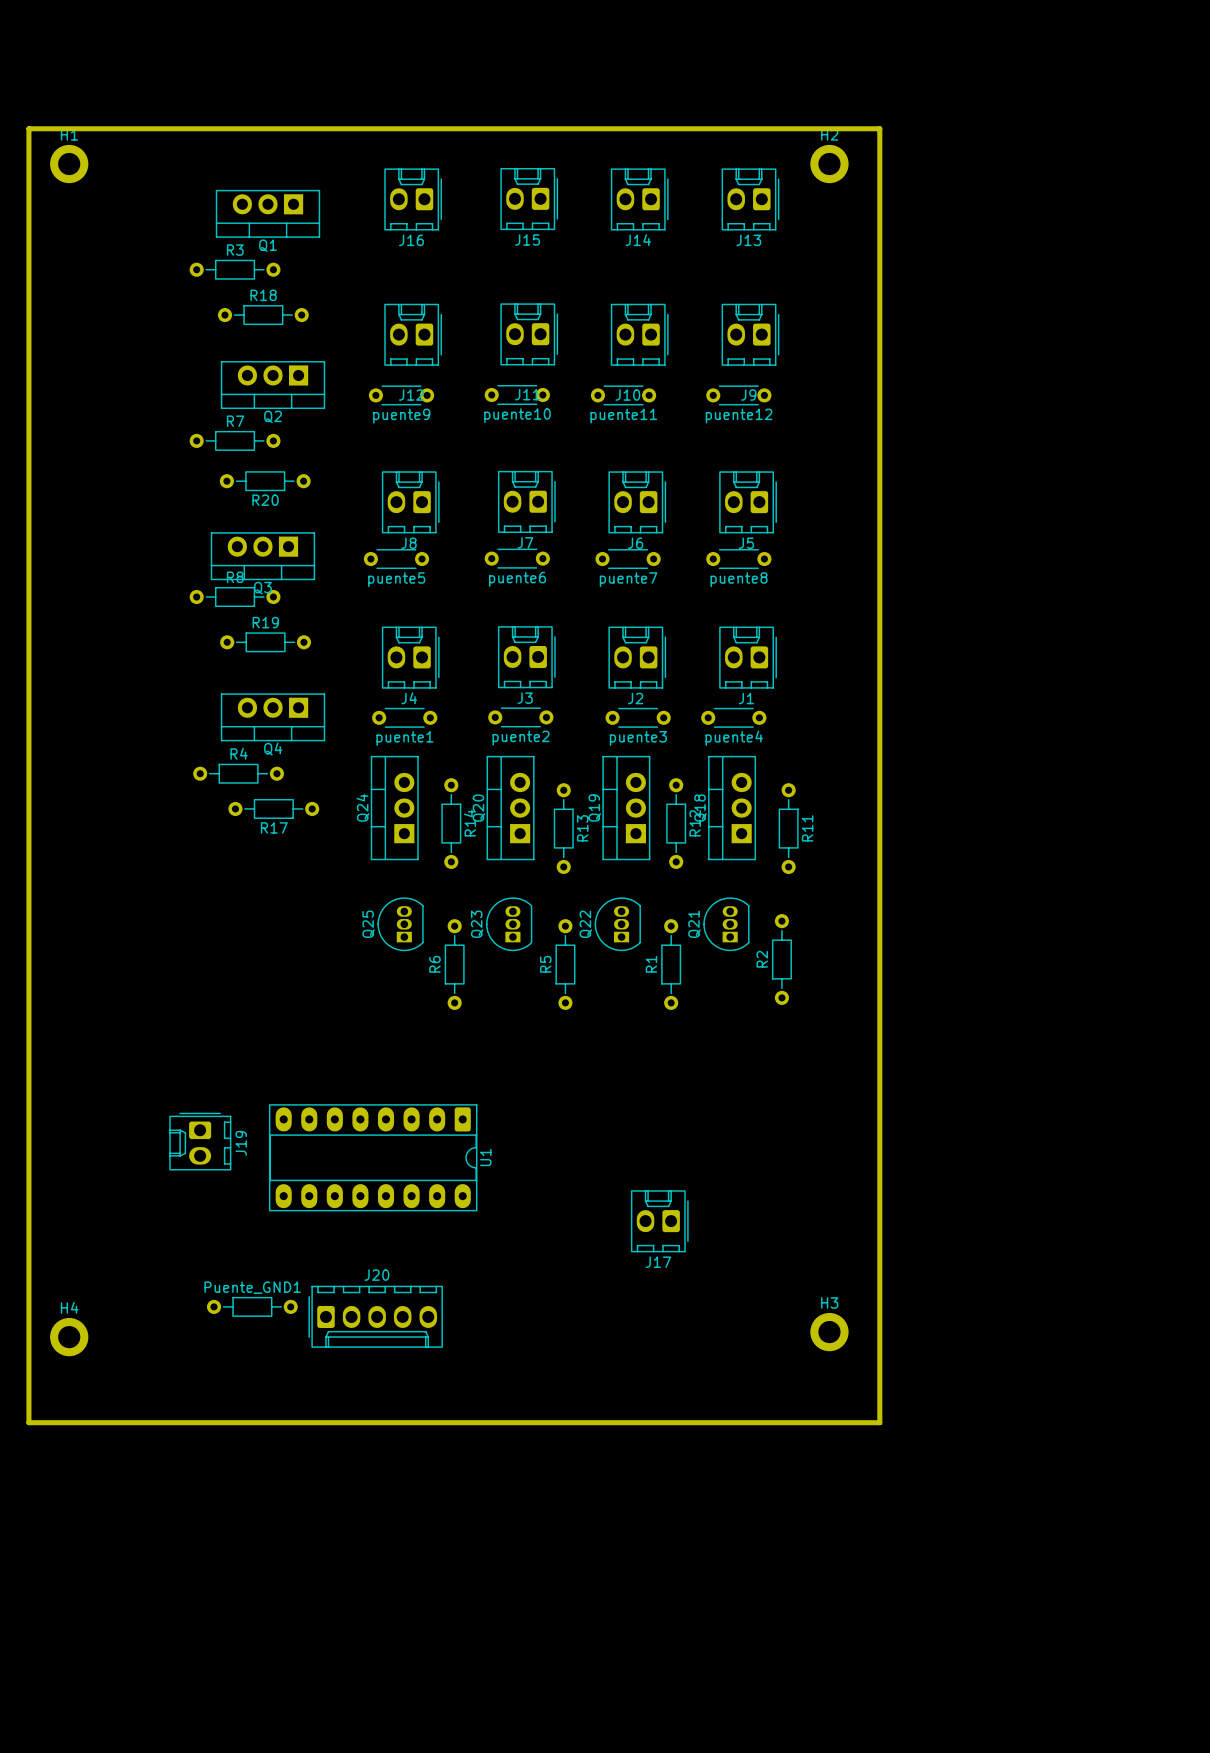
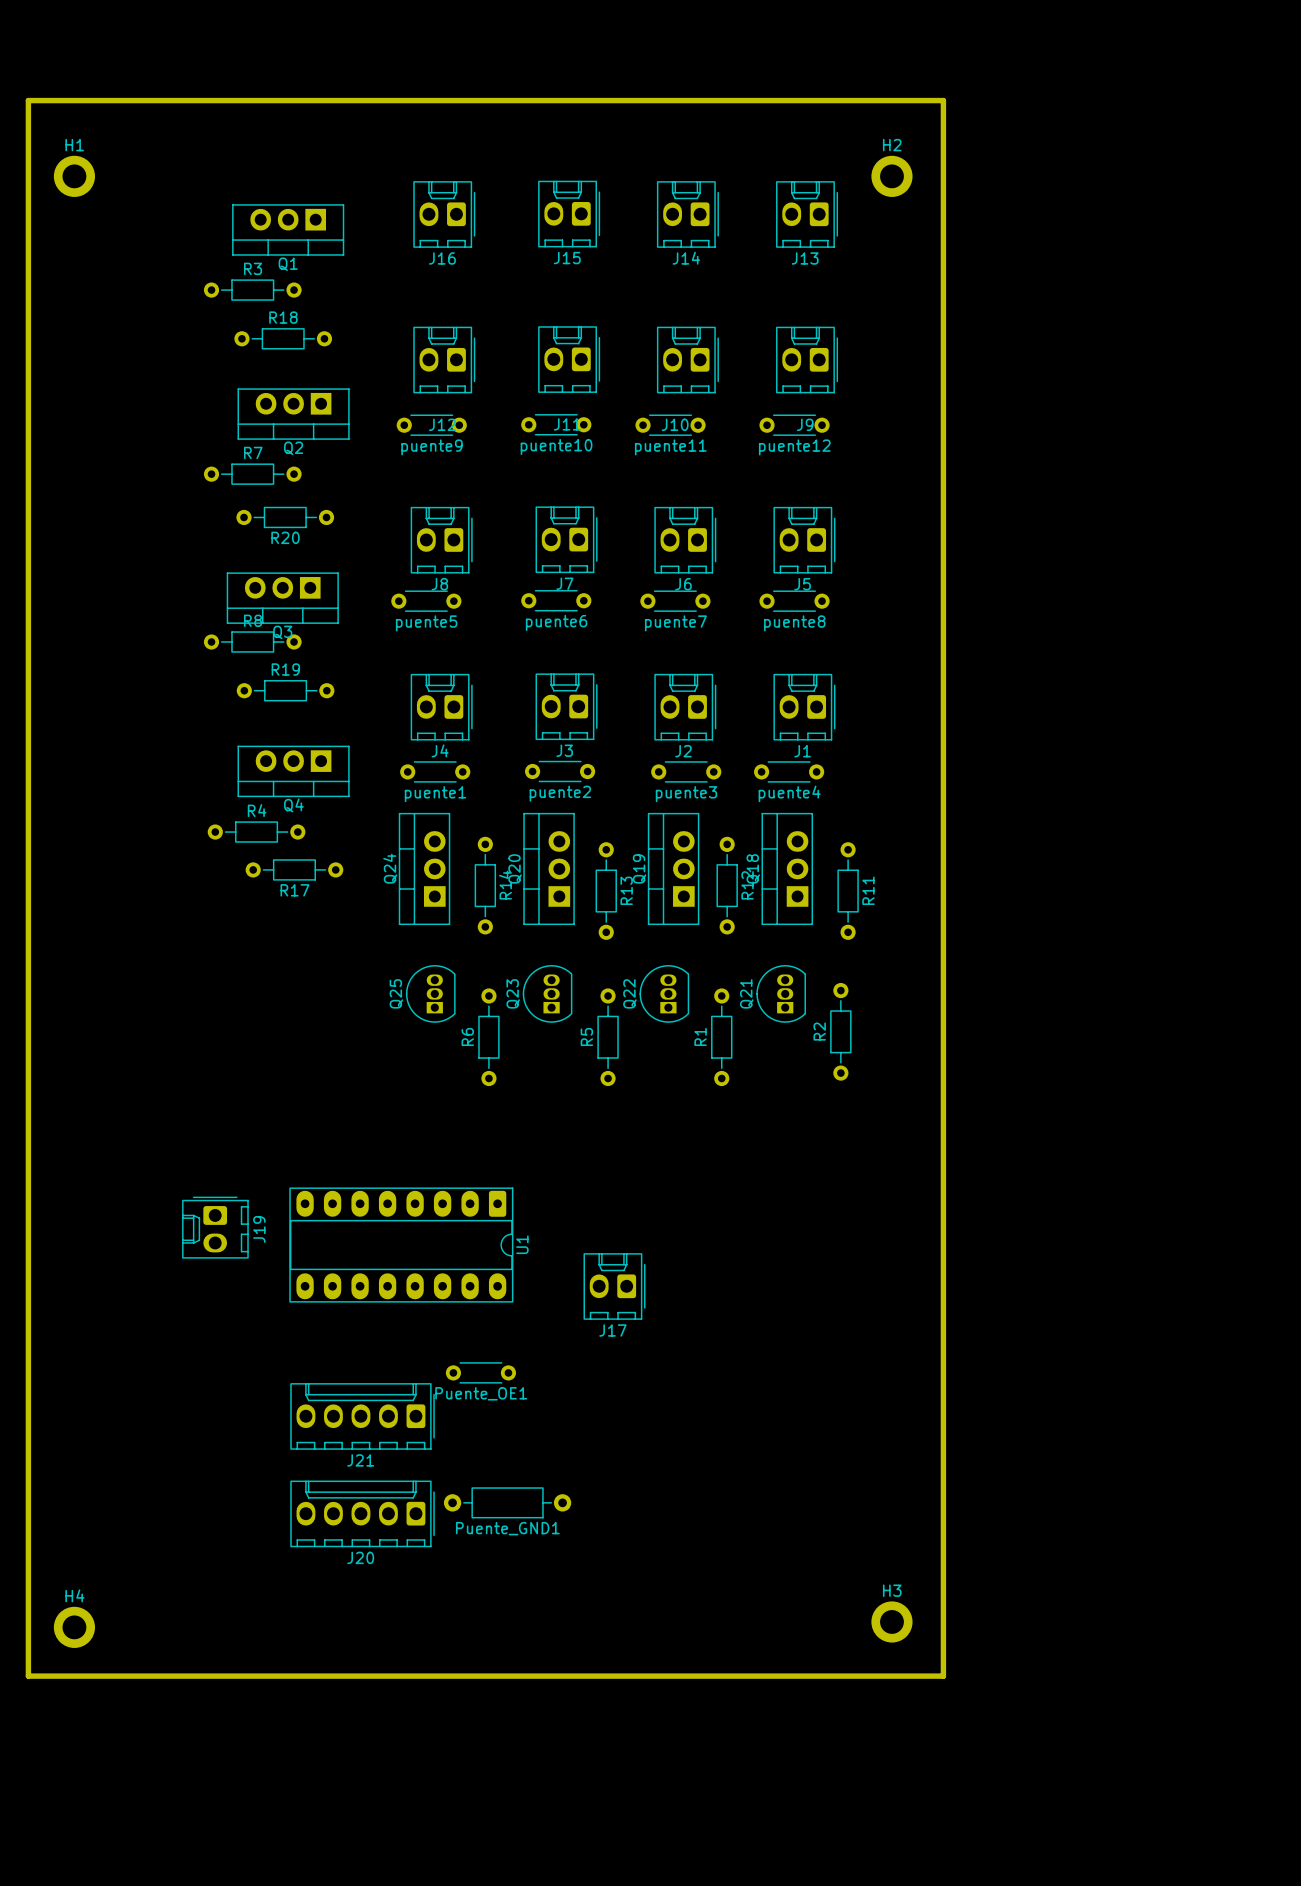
board edge: (28, 128) (879, 128) (879, 1422) (28, 1422) (28, 128) -> (28, 100) (28, 1676) (943, 1676) (943, 100) (28, 100)
J17 position: (659, 1221) -> (614, 1286)
Puente_OE1: none -> (480, 1372)
Puente_GND1 name position: Puente_GND1 (252, 1287) -> Puente_GND1 (507, 1528)
Puente_GND1 footprint: [206, 1297, 298, 1317] -> [443, 1487, 572, 1519]
J20 rotation: 0° (375, 1316) -> 180° (362, 1513)
J20 position: (375, 1316) -> (362, 1513)
J21: none -> (362, 1416)
H3 position: (829, 1332) -> (891, 1621)
H4 position: (69, 1337) -> (74, 1627)

